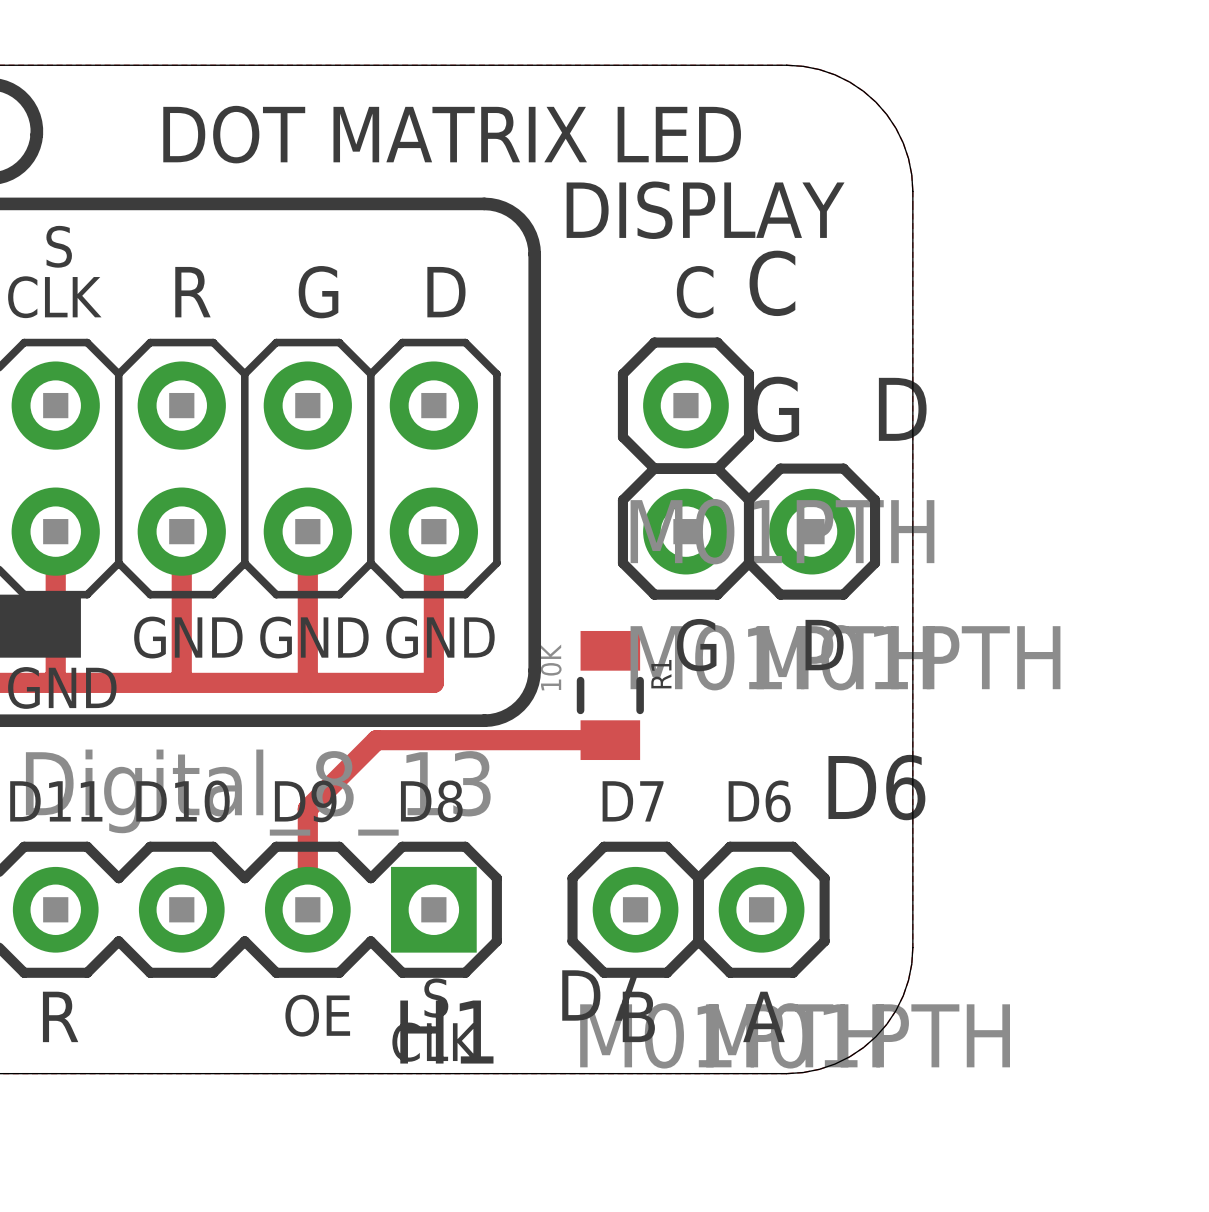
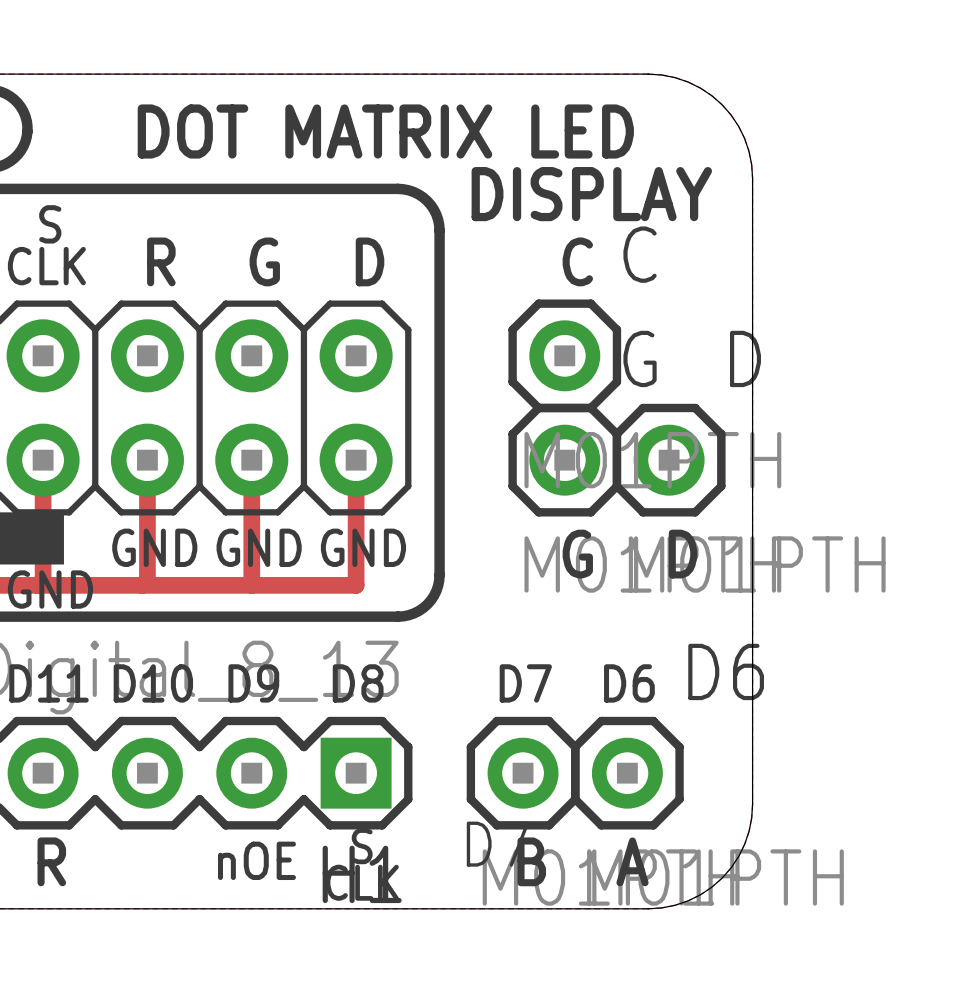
R1: 10K (610, 695) -> none
track: (610, 740) (376, 740) (307, 808) (307, 909) -> none
text: OE (317, 1015) -> nOE (256, 860)

